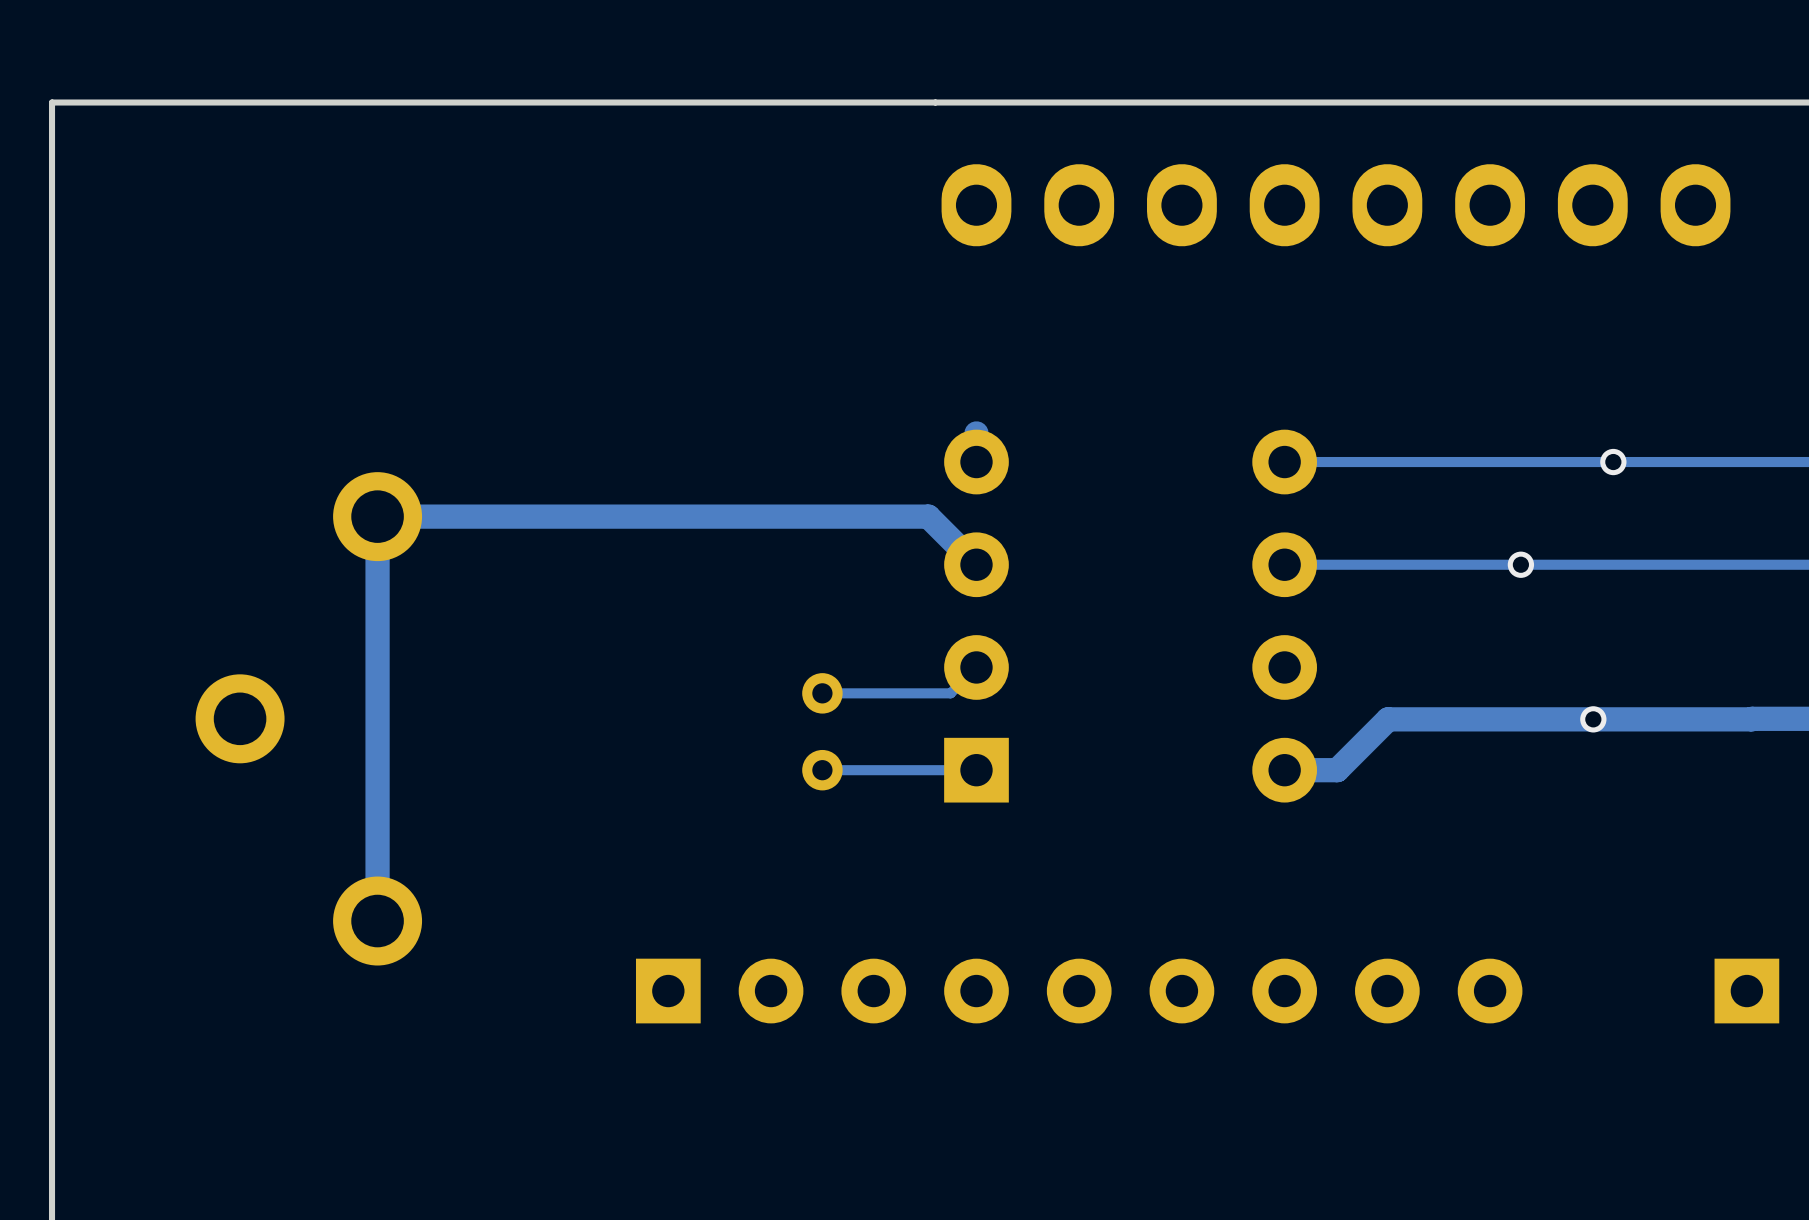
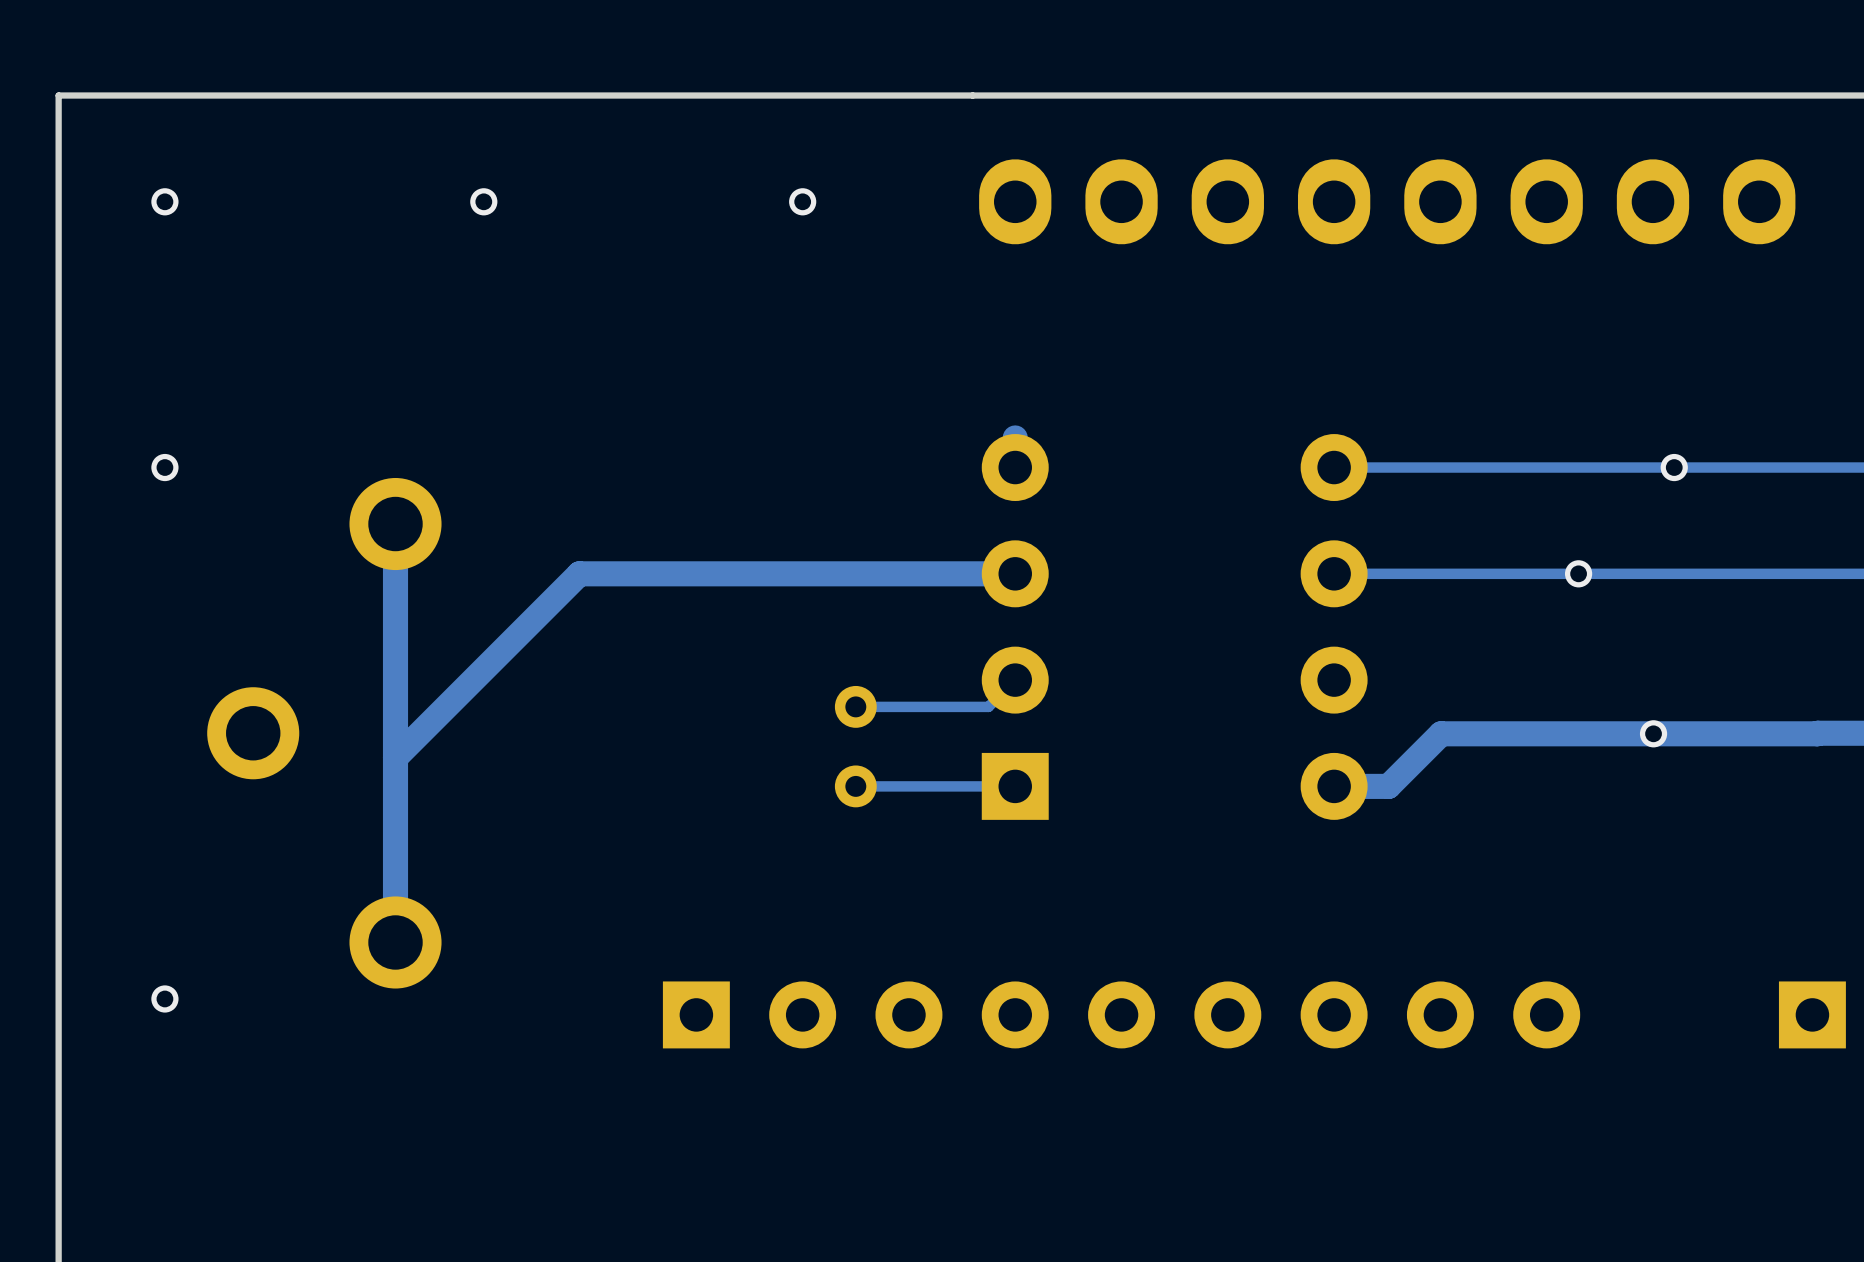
via: none -> (164, 201)
via: none -> (483, 201)
via: none -> (802, 201)
via: none -> (164, 467)
track: (377, 516) (928, 516) (976, 564) -> (395, 757) (579, 573) (1015, 573)
via: none -> (164, 998)

